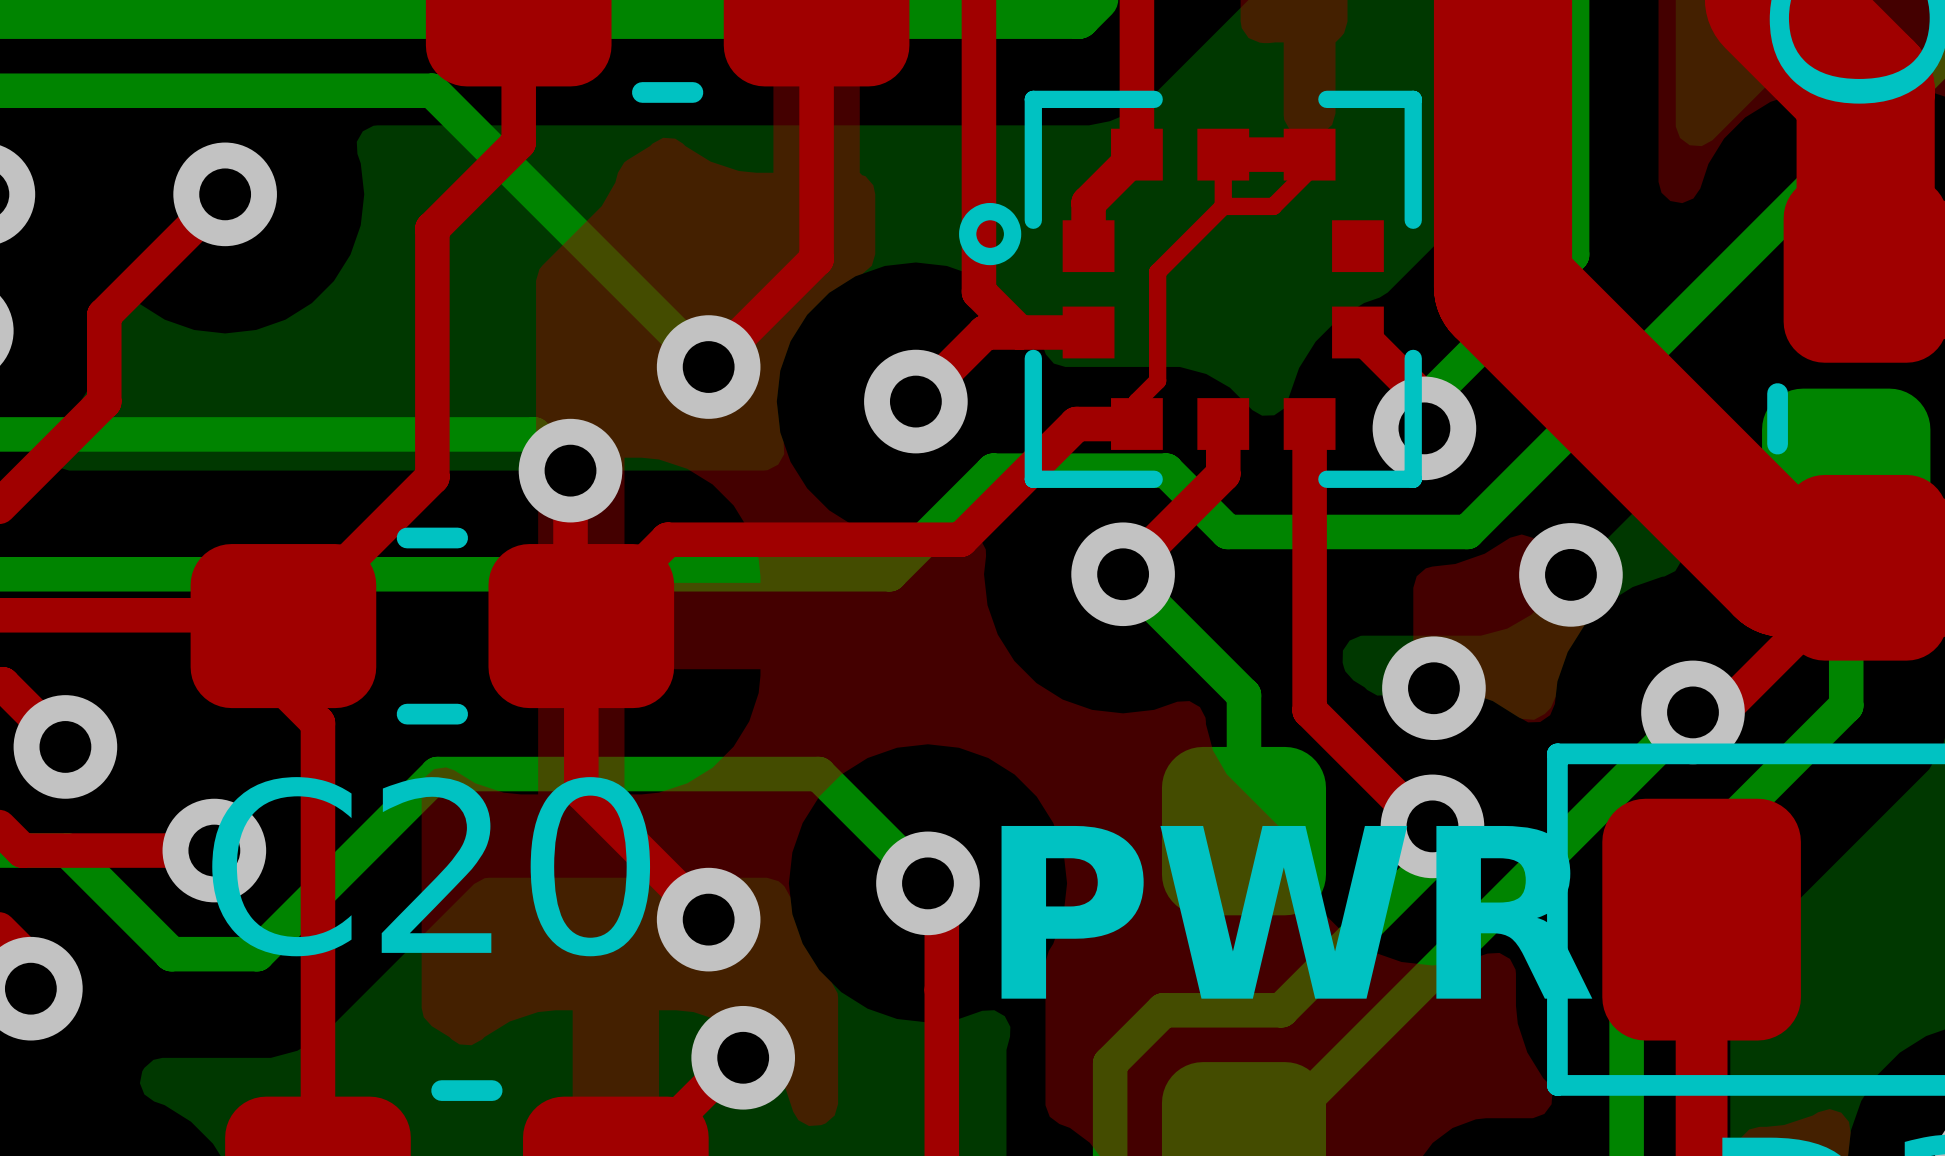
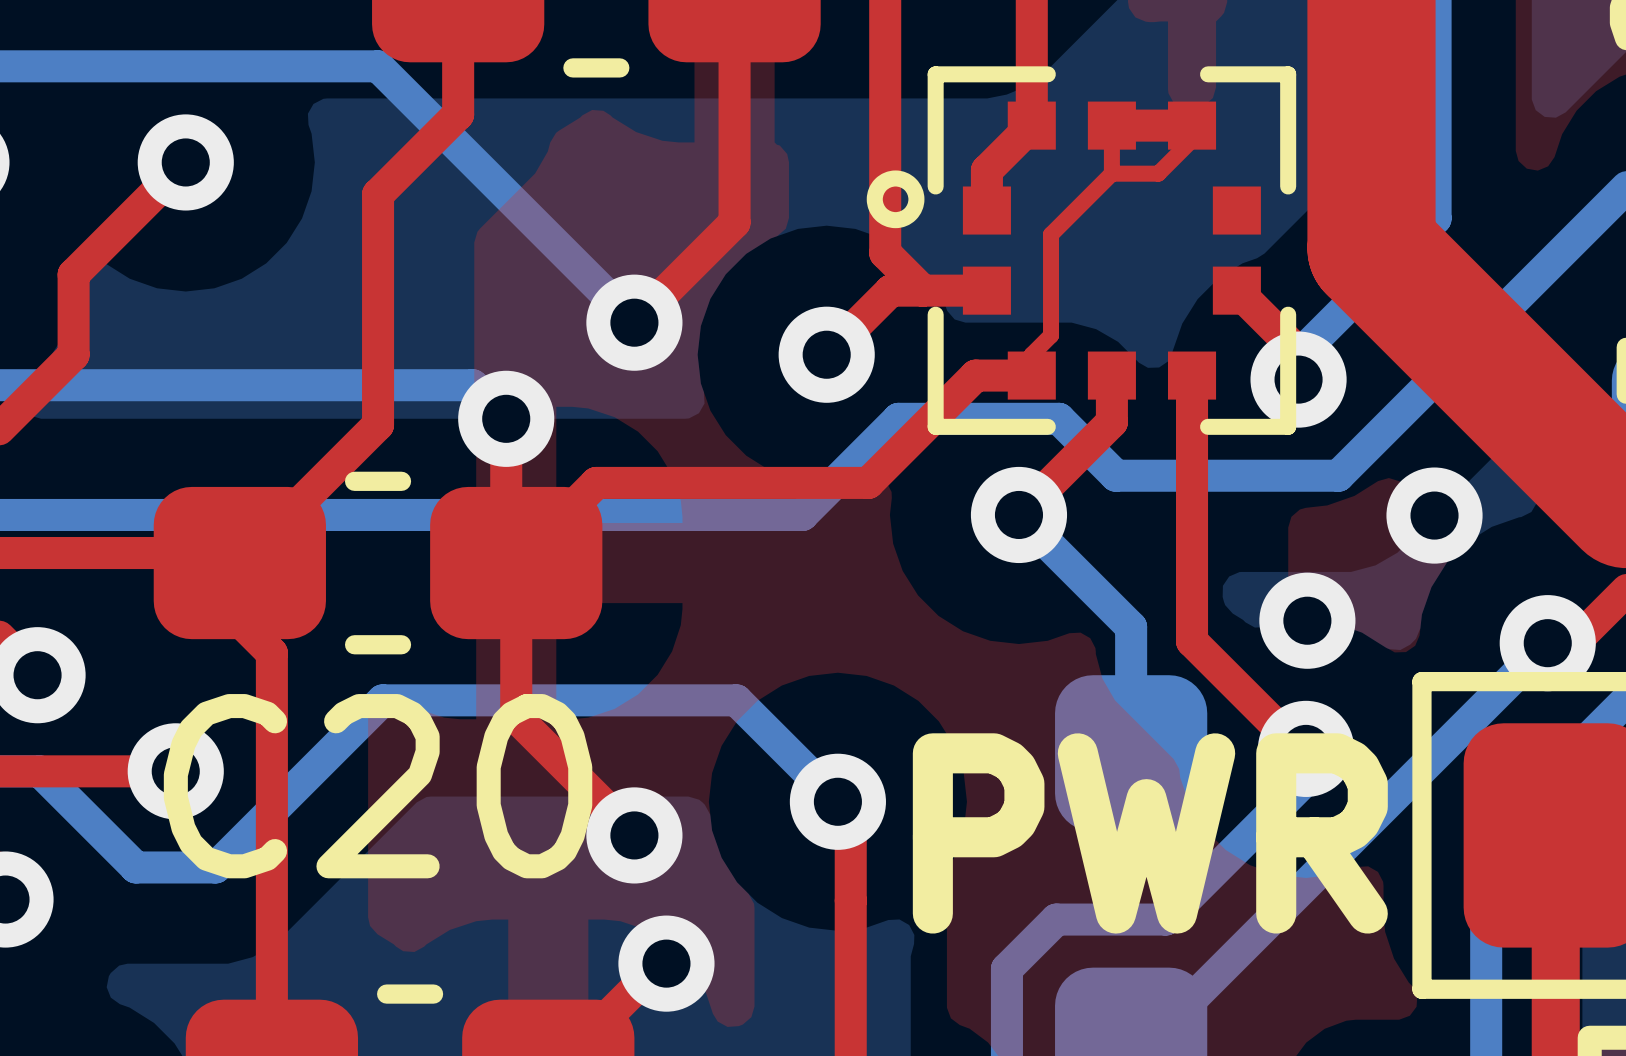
text position: PWR (1296, 912) -> PWR (1150, 833)

